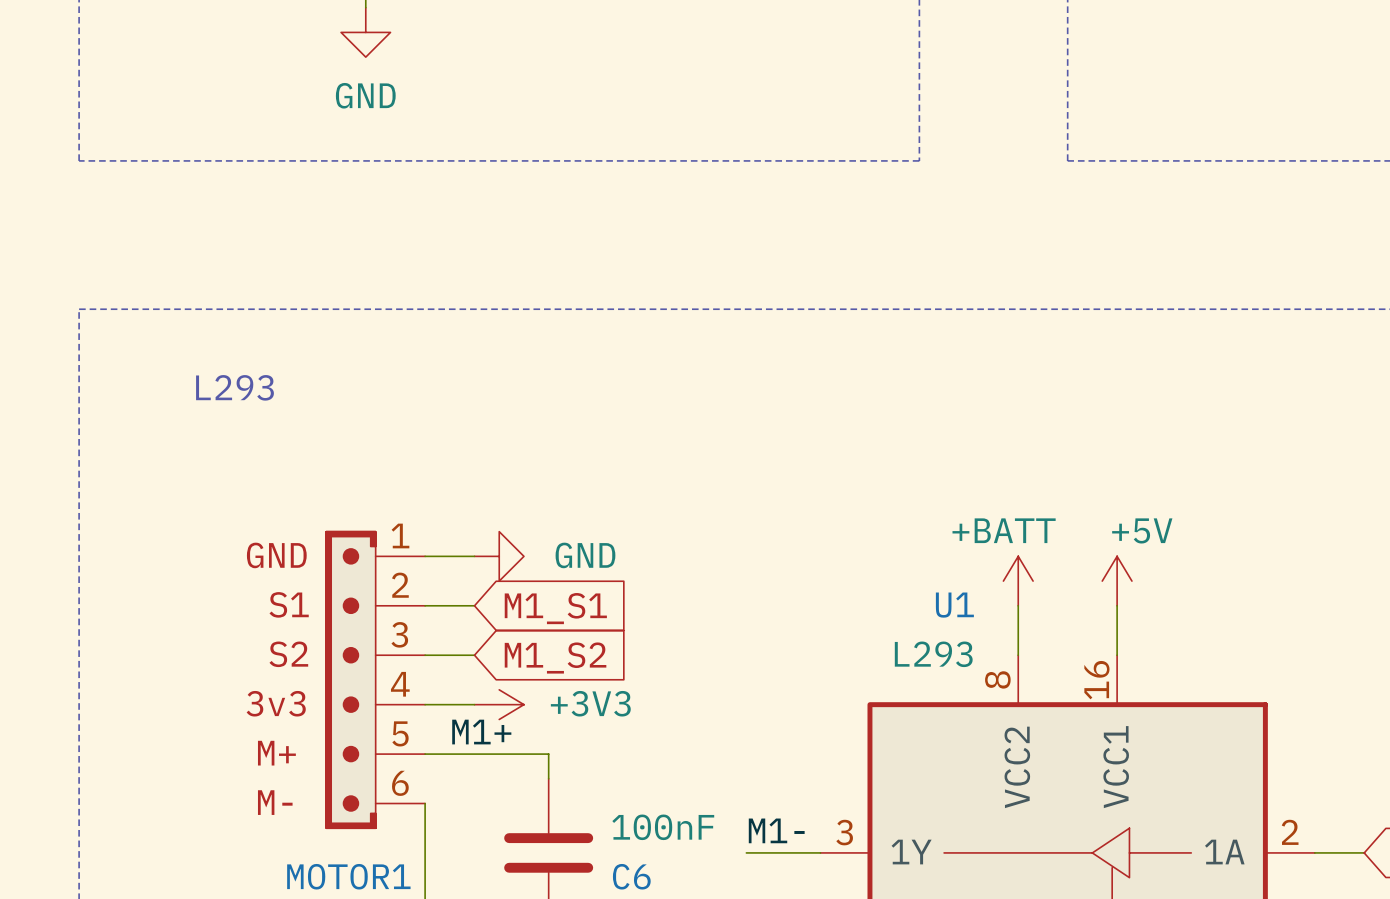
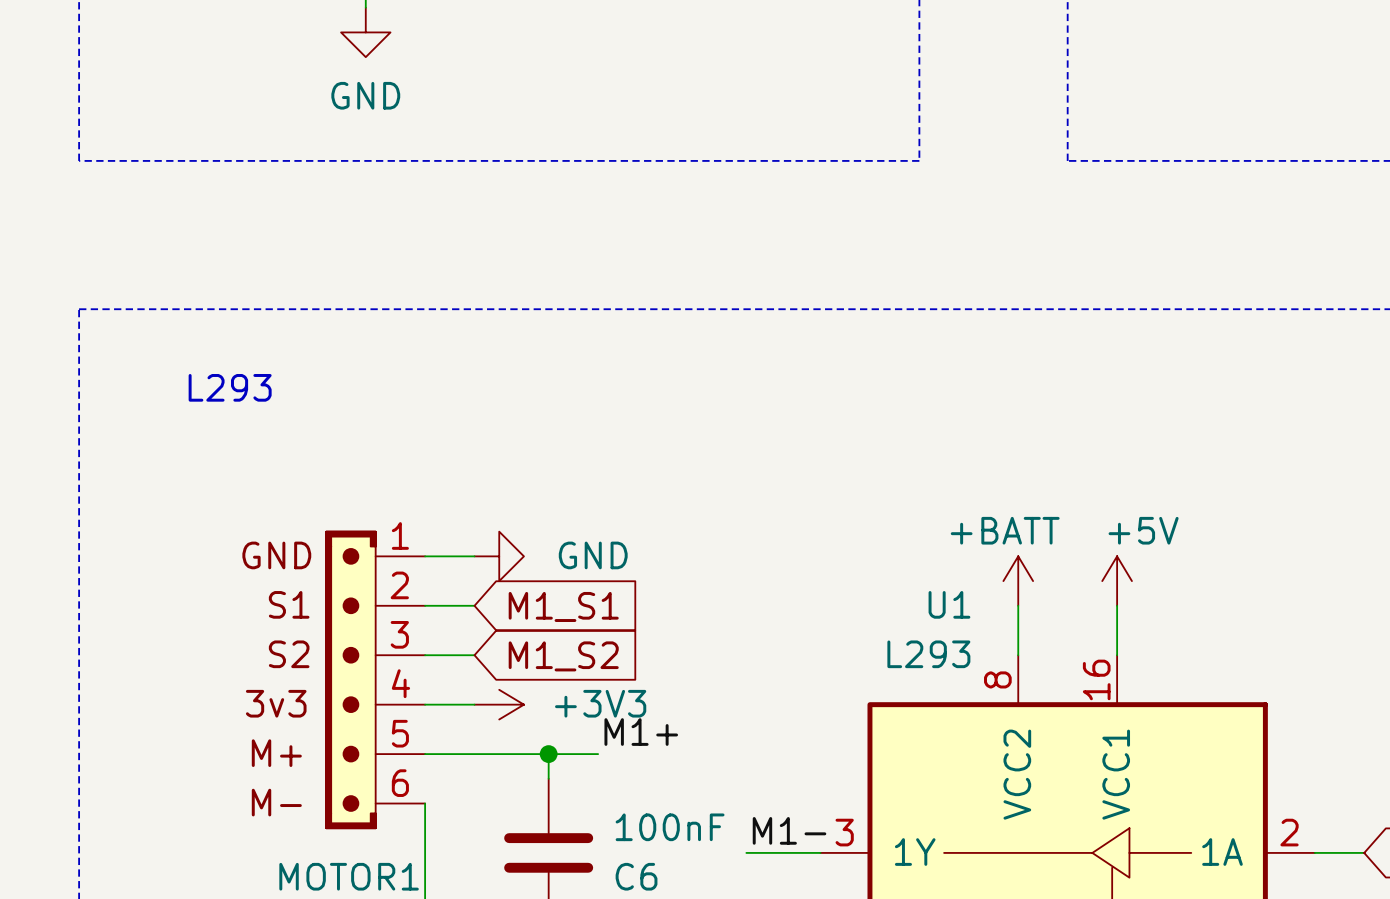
label position: M1+ (481, 732) -> M1+ (641, 732)
wire: none -> (548, 754) (598, 754)
junction: none -> (548, 754)

